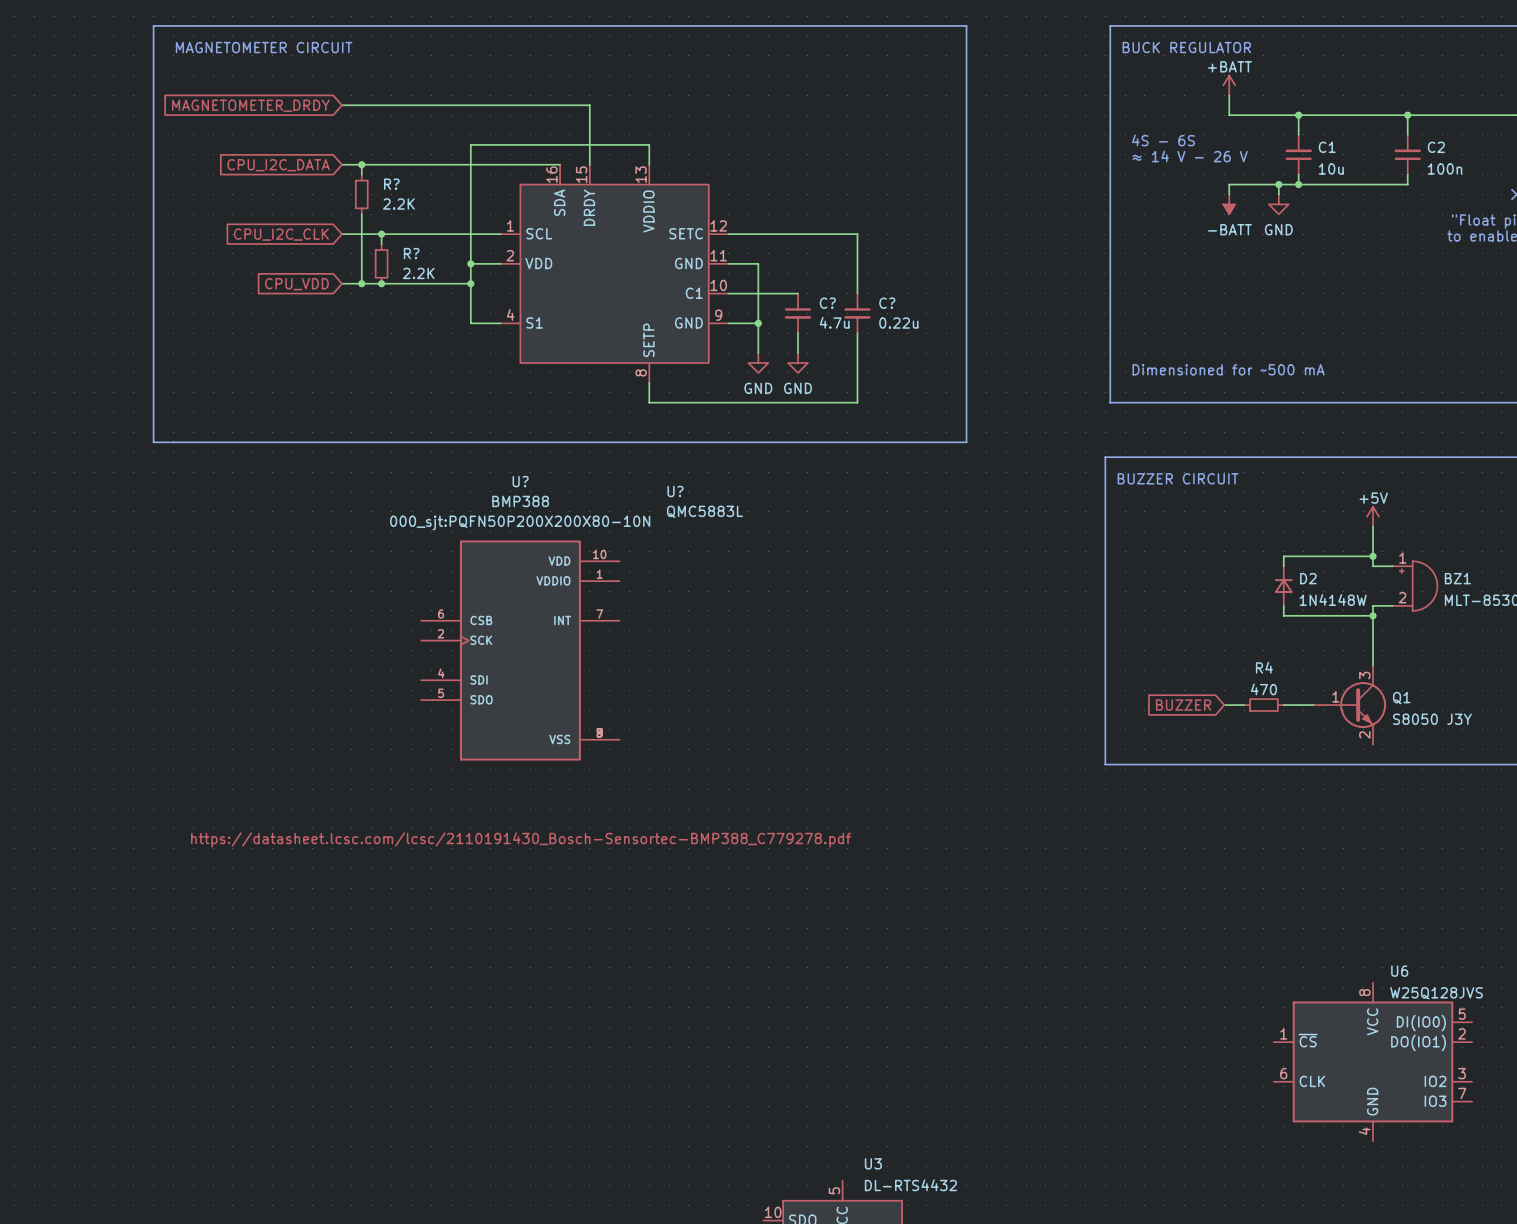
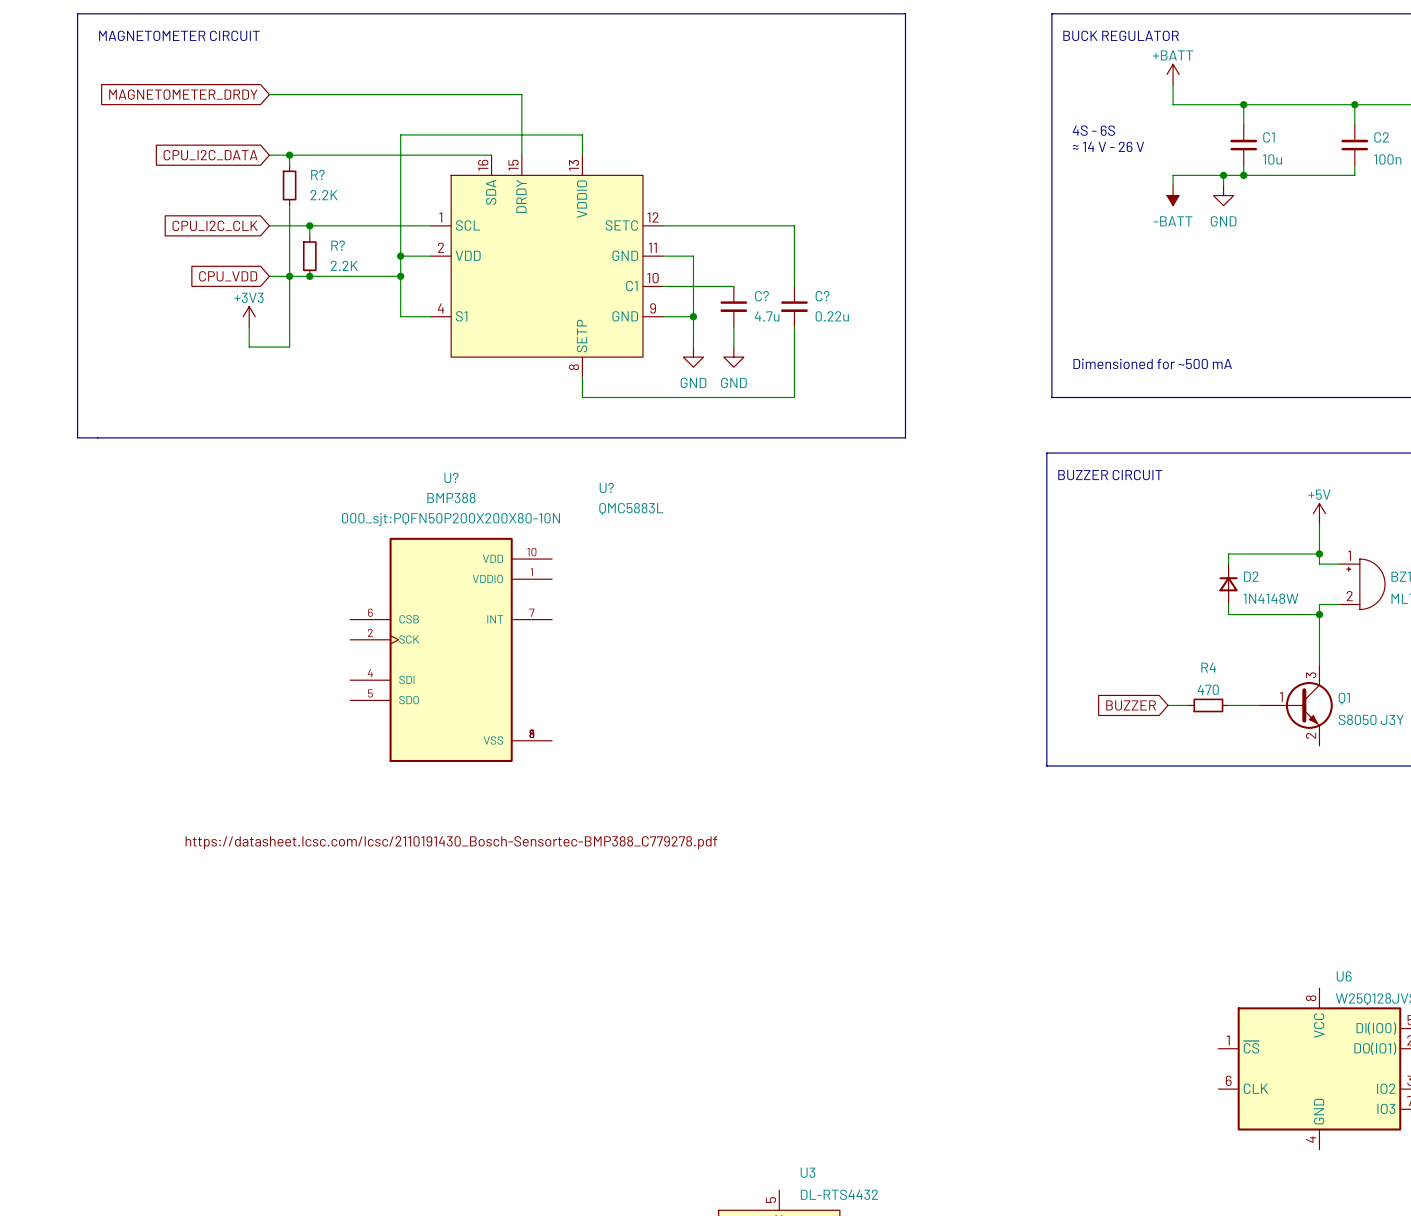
wire: none -> (289, 276) (289, 347) (249, 347) (249, 326)
power symbol: none -> +3V3 (249, 316)

